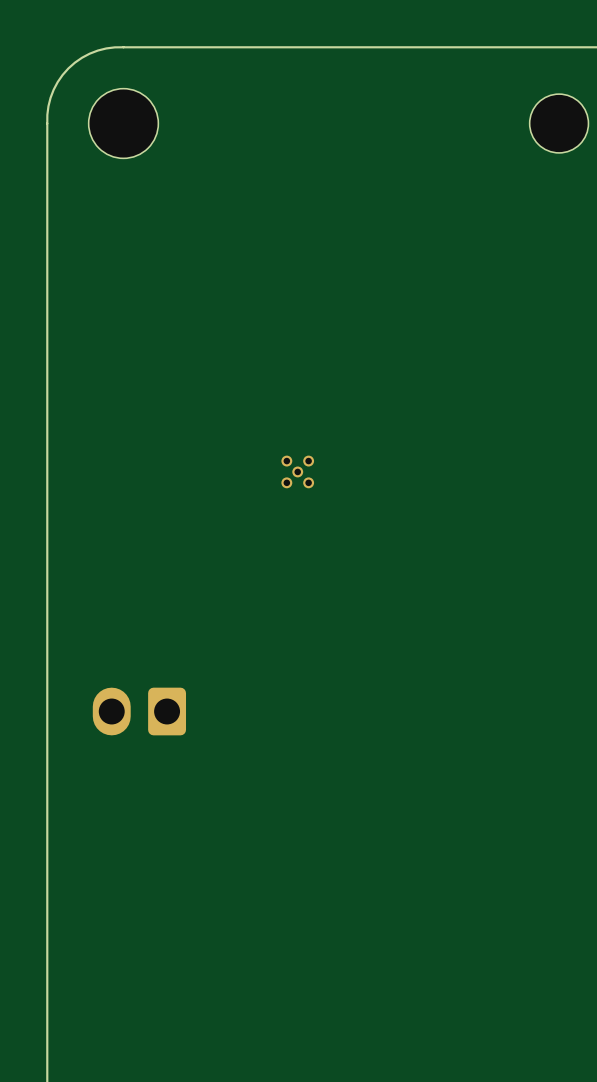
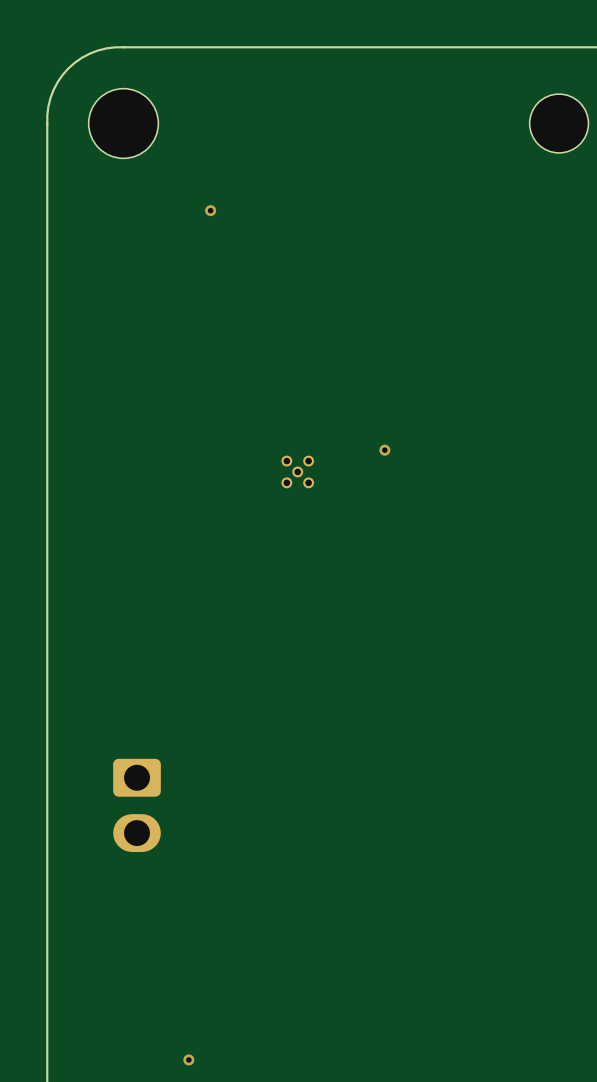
via: none -> (210, 210)
via: none -> (384, 450)
part rotation: 0° (139, 711) -> 90° counterclockwise (137, 805)
part position: (139, 711) -> (137, 805)
via: none -> (188, 1059)

